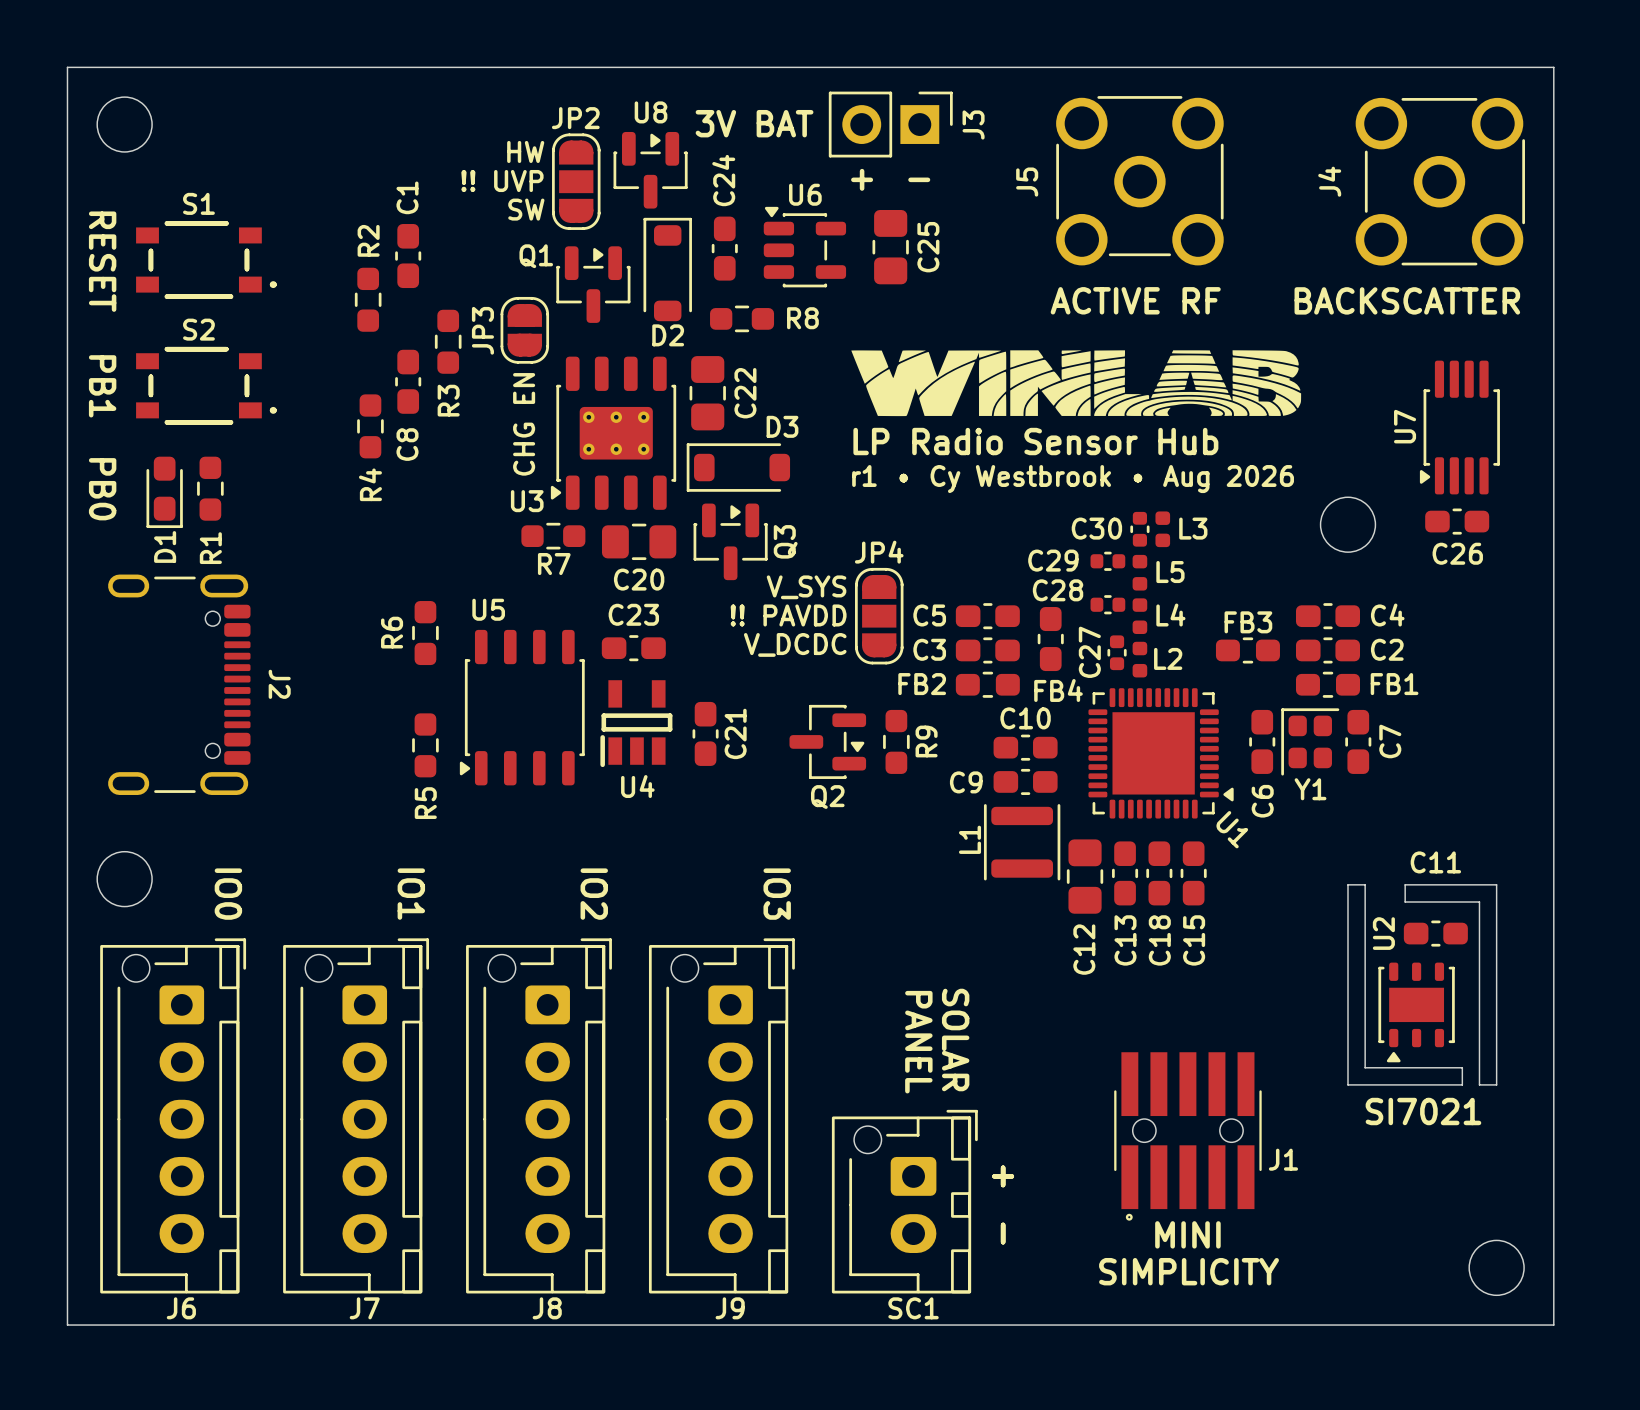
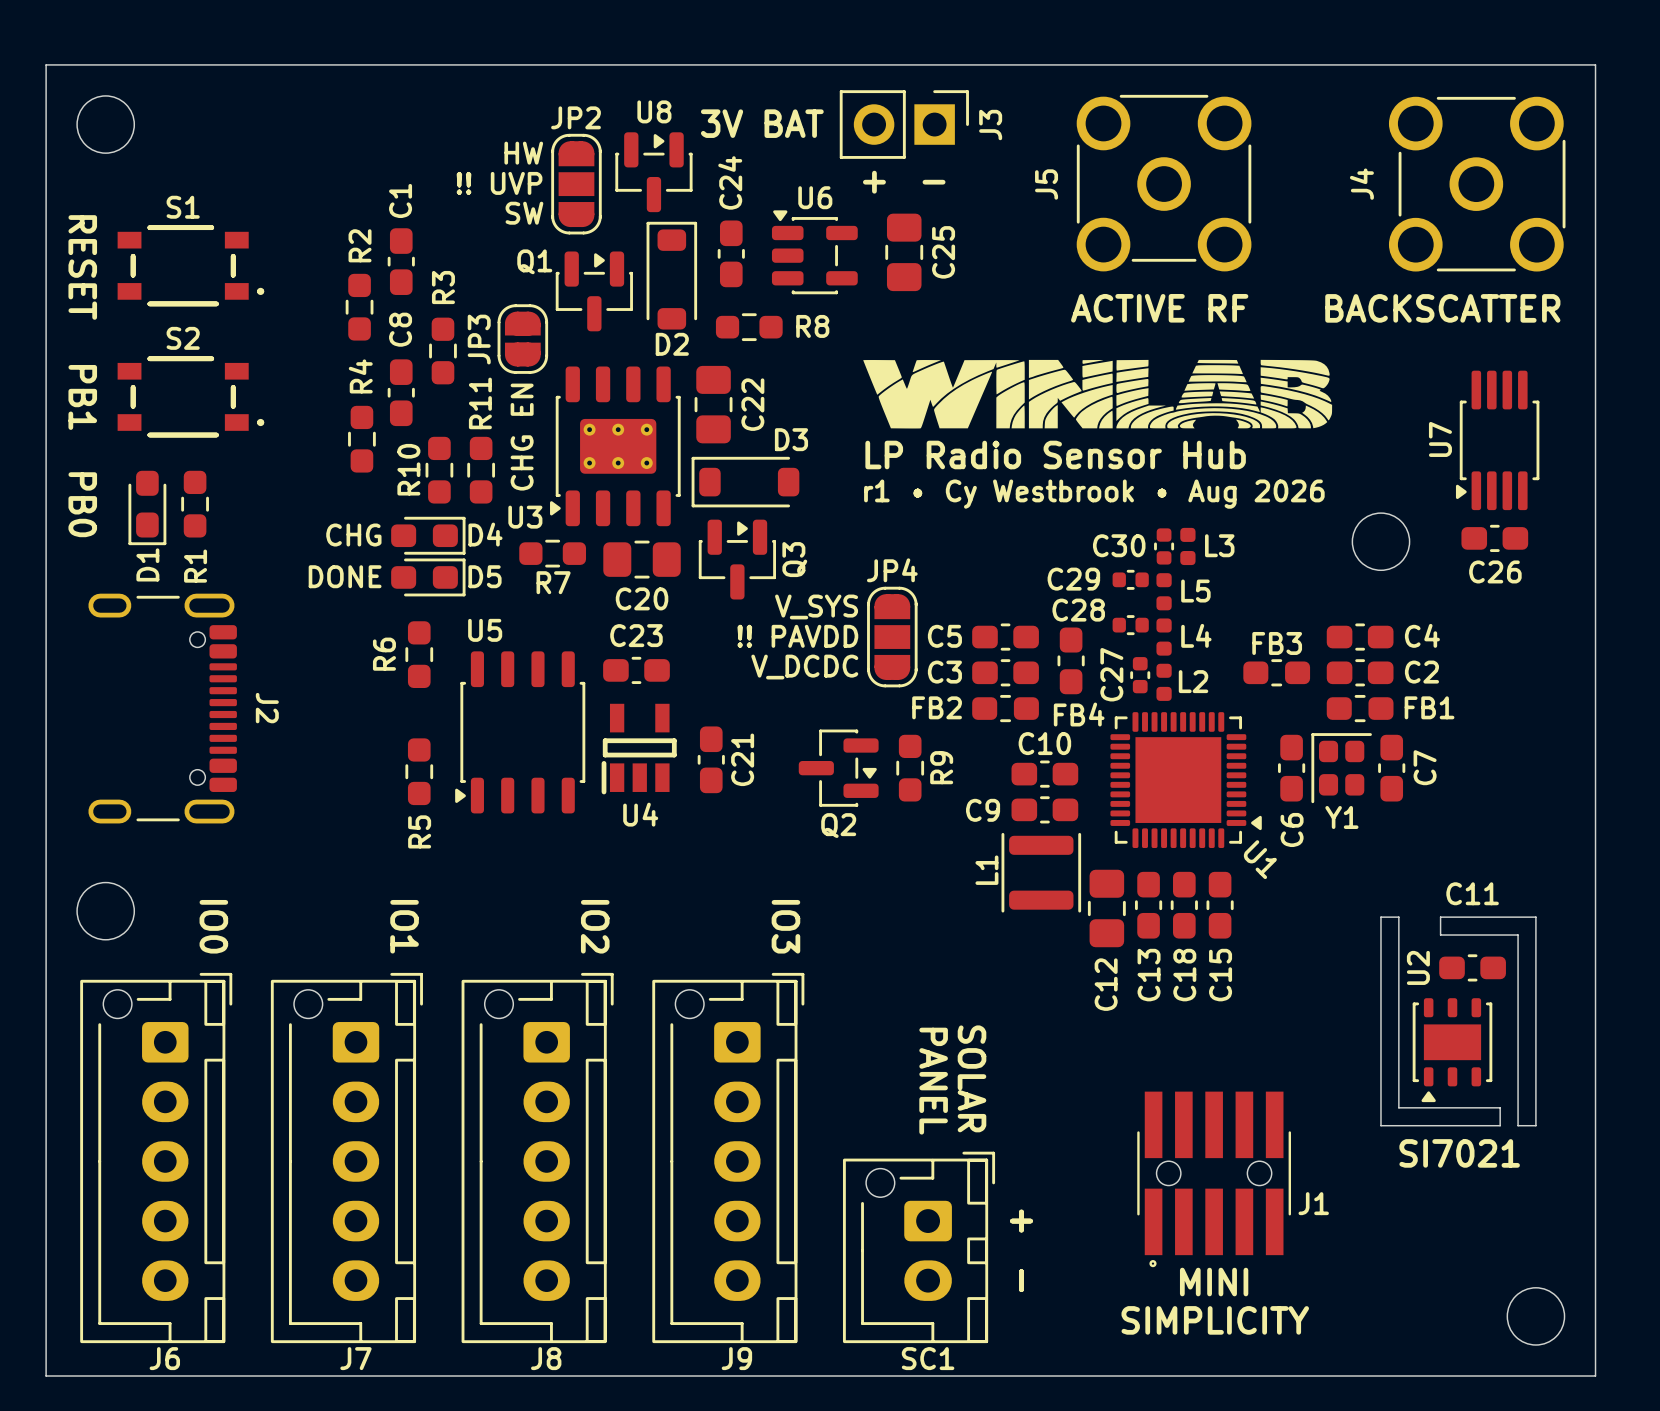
R3 name position: R3 (448, 400) -> R3 (443, 287)
C8 name position: C8 (407, 444) -> C8 (400, 329)
R10: none -> (439, 470)
R11: none -> (481, 470)
R4 name position: R4 (370, 484) -> R4 (360, 376)
text: none -> CHG (353, 535)
D4: none -> (428, 535)
text: none -> DONE (345, 576)
D5: none -> (428, 577)

